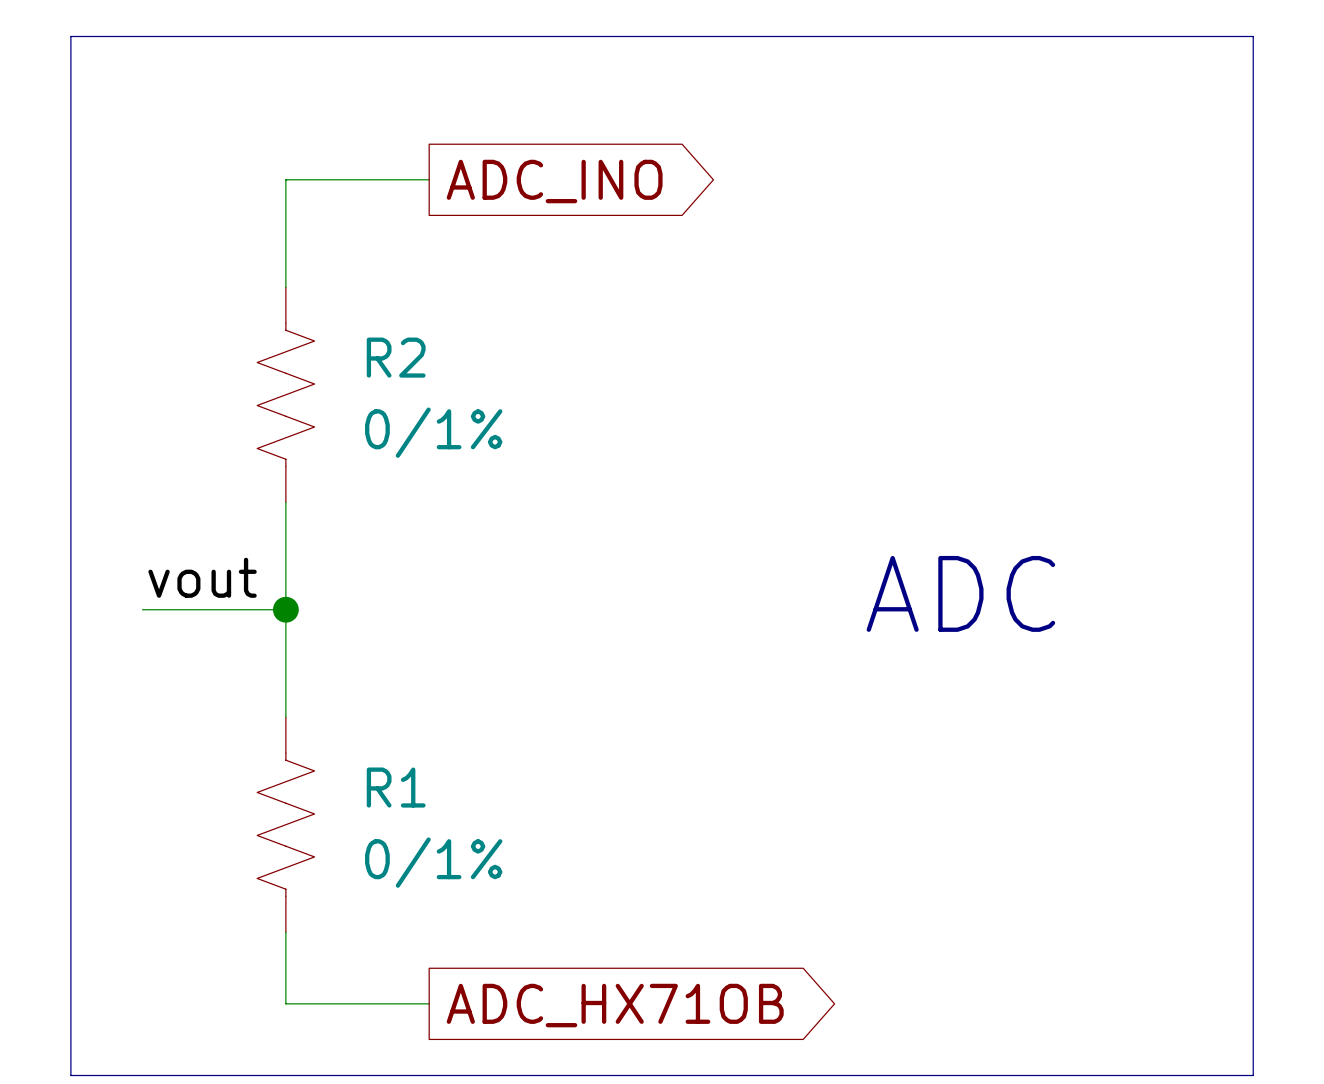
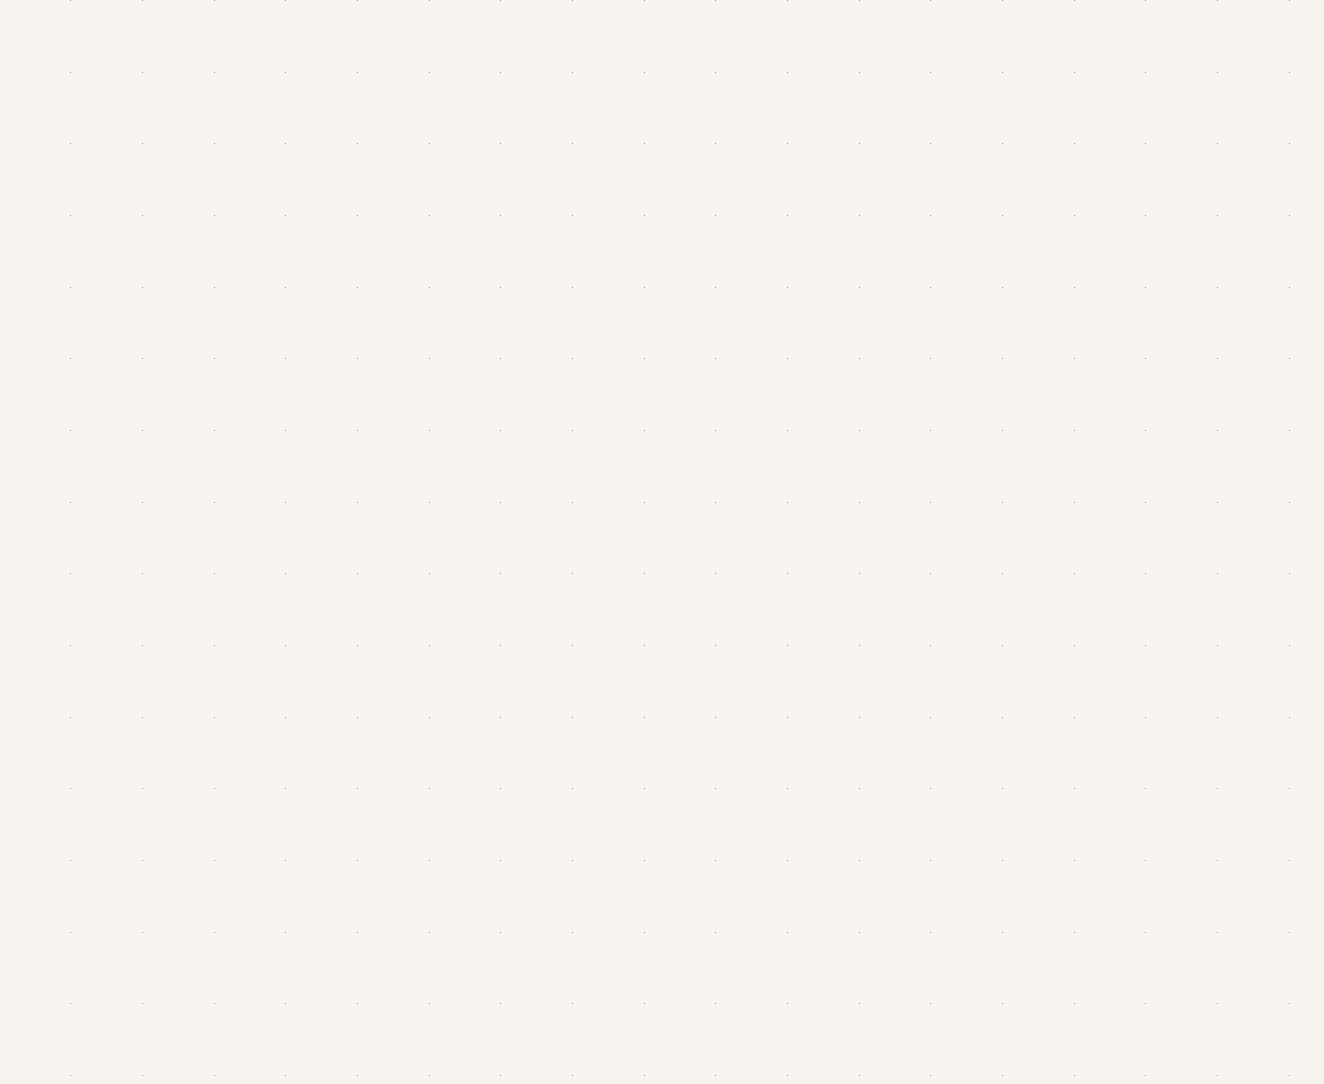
line: (70, 36) (1253, 36) (1253, 1075) (70, 1075) (70, 36) -> none
wire: (429, 179) (285, 179) (285, 287) -> none
global label: ADC_INO (554, 181) -> none
R2: 0/1% (285, 394) -> none
wire: (285, 502) (285, 717) -> none
label: vout (202, 577) -> none
text: ADC (960, 593) -> none
wire: (142, 609) (285, 609) -> none
junction: (285, 609) -> none
R1: 0/1% (285, 824) -> none
wire: (285, 932) (285, 1003) (429, 1003) -> none
global label: ADC_HX71OB (615, 1005) -> none

